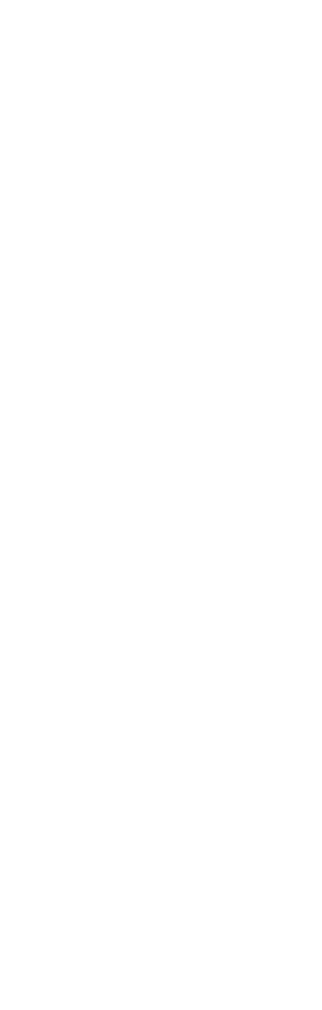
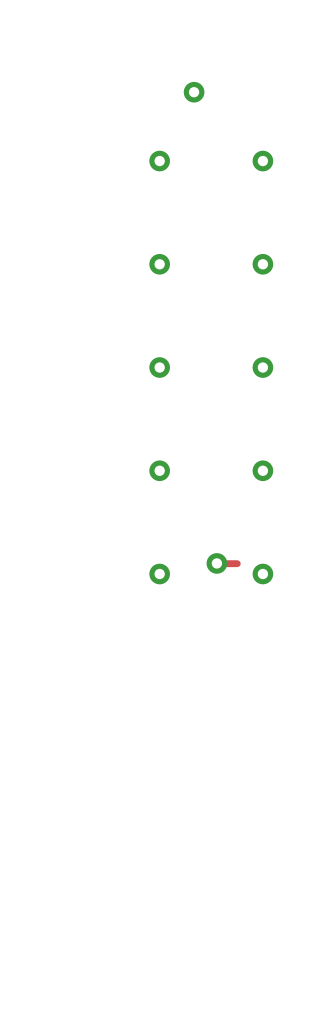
via: none -> (194, 92)
via: none -> (159, 161)
via: none -> (262, 161)
via: none -> (159, 264)
via: none -> (262, 264)
via: none -> (159, 367)
via: none -> (262, 367)
via: none -> (159, 470)
via: none -> (262, 470)
via: none -> (216, 563)
top track: none -> (237, 563) (217, 563)
via: none -> (159, 574)
via: none -> (262, 574)

